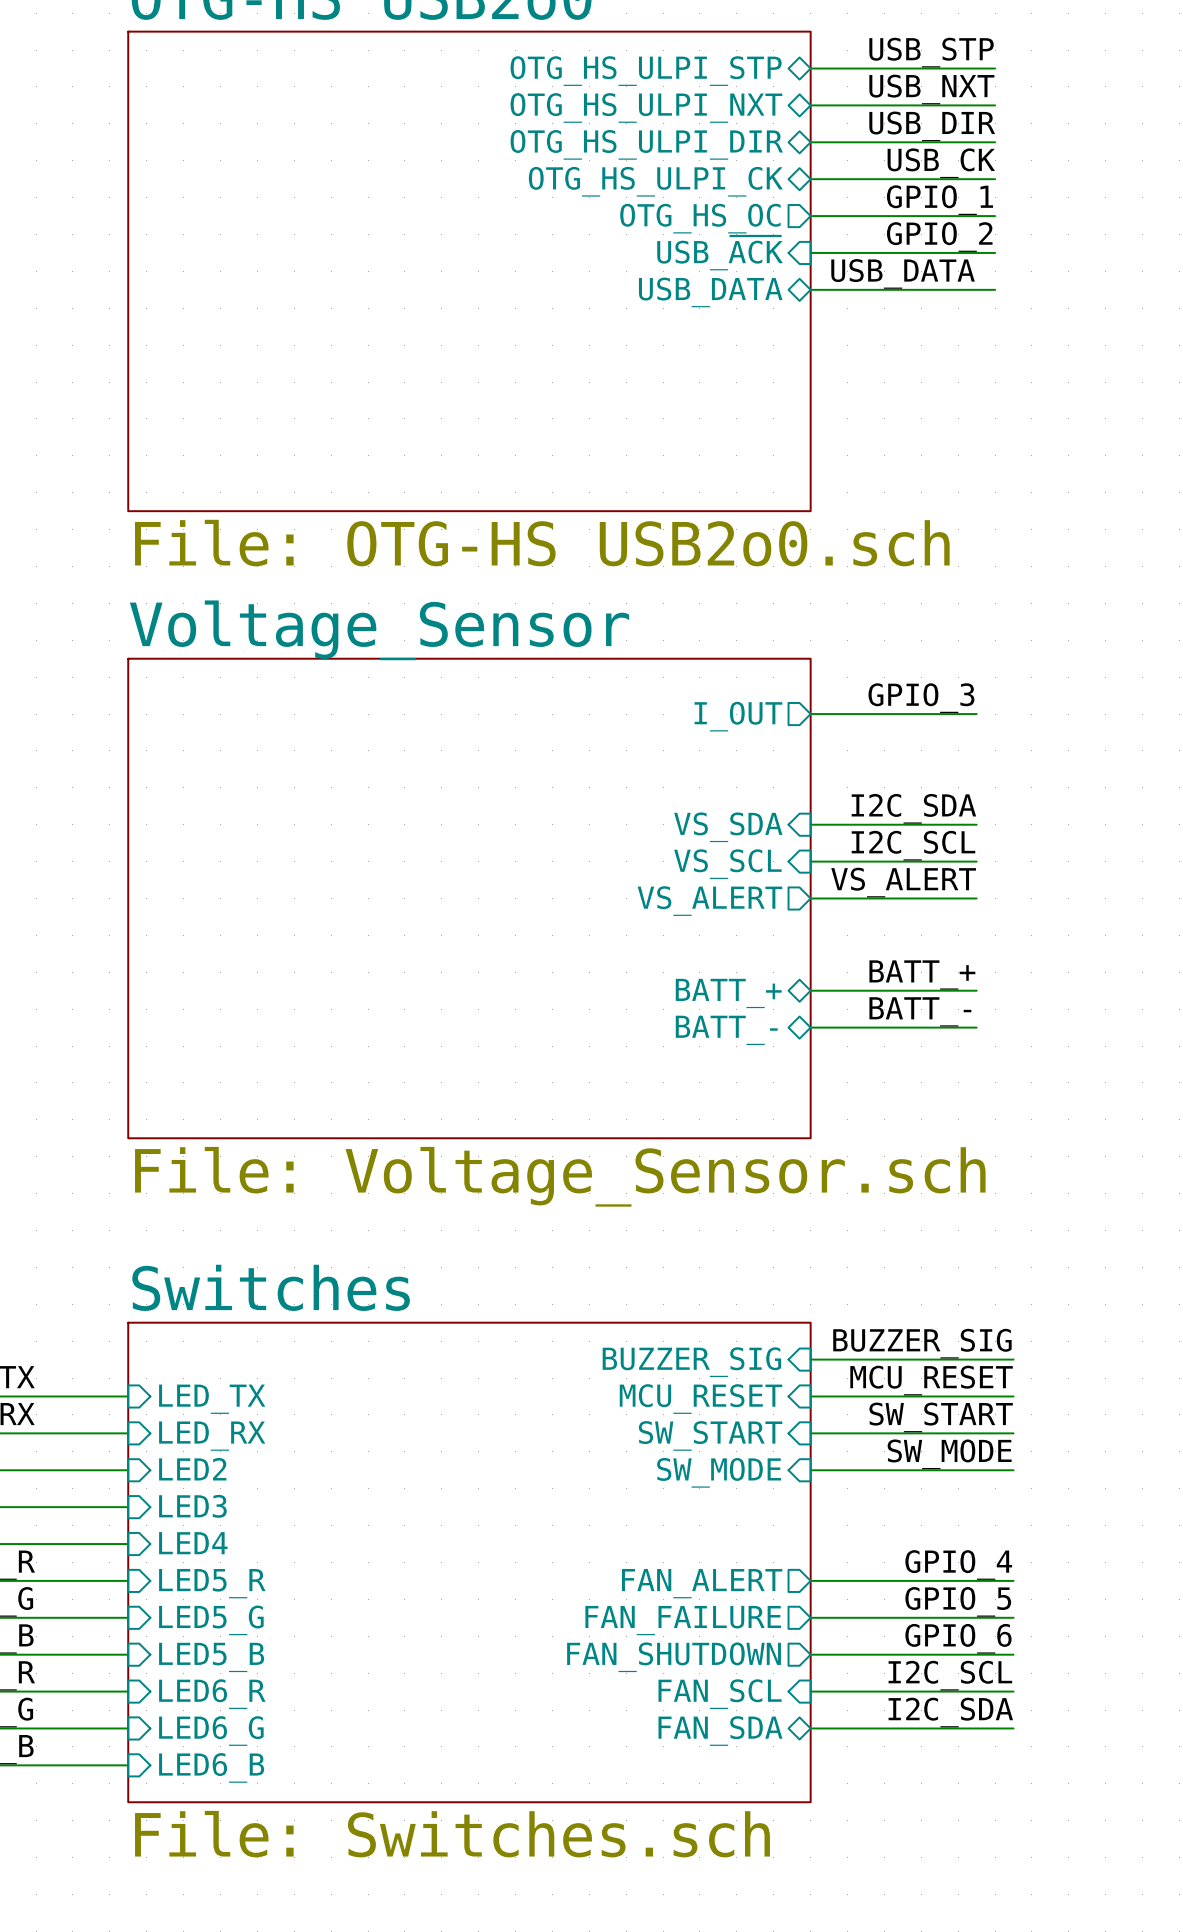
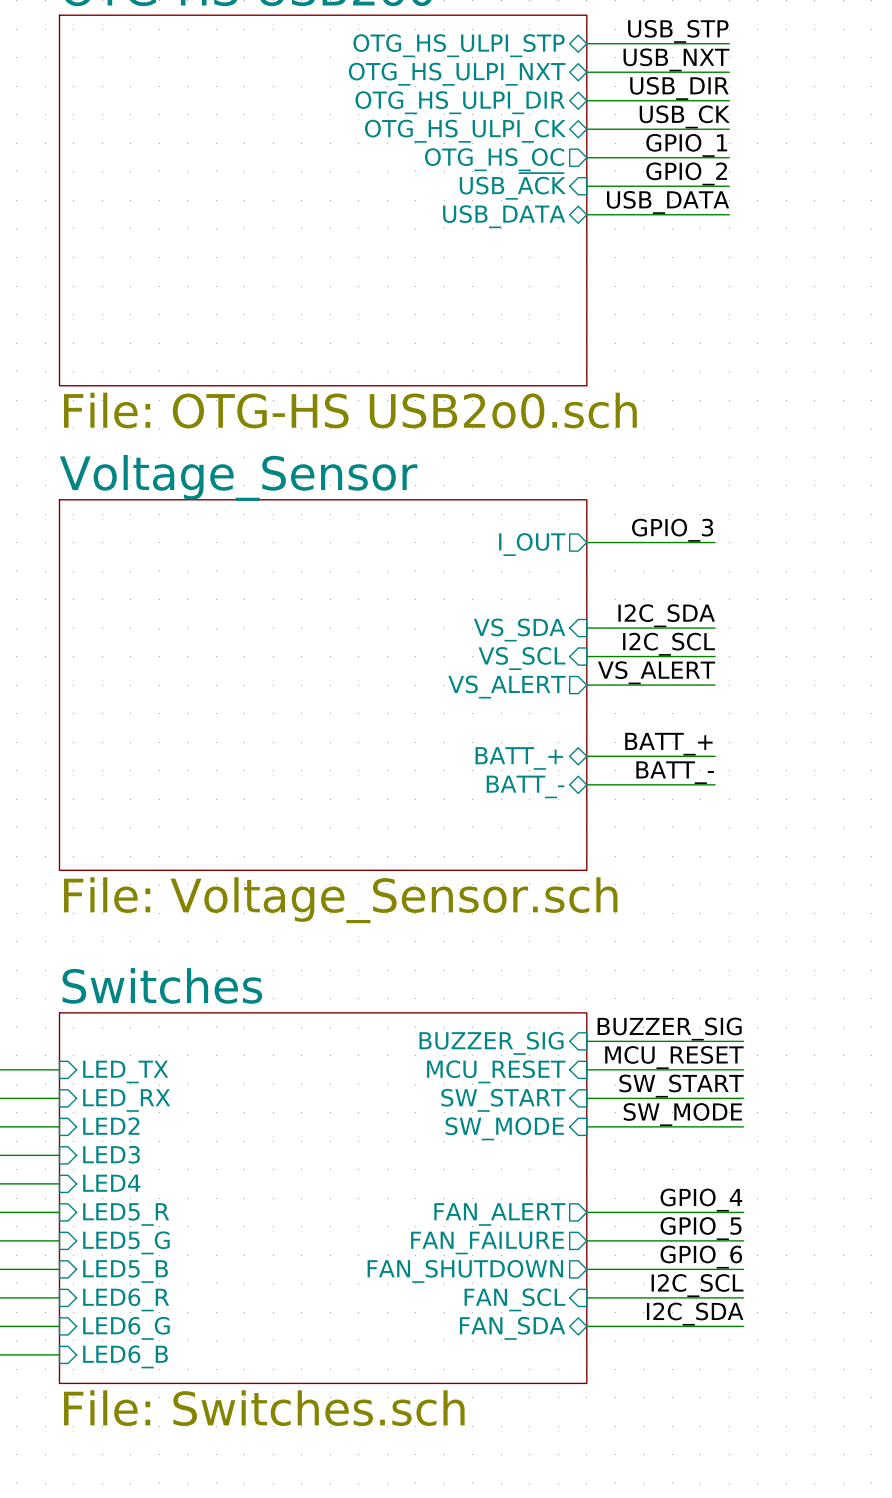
label position: USB_DATA (903, 273) -> USB_DATA (668, 202)

